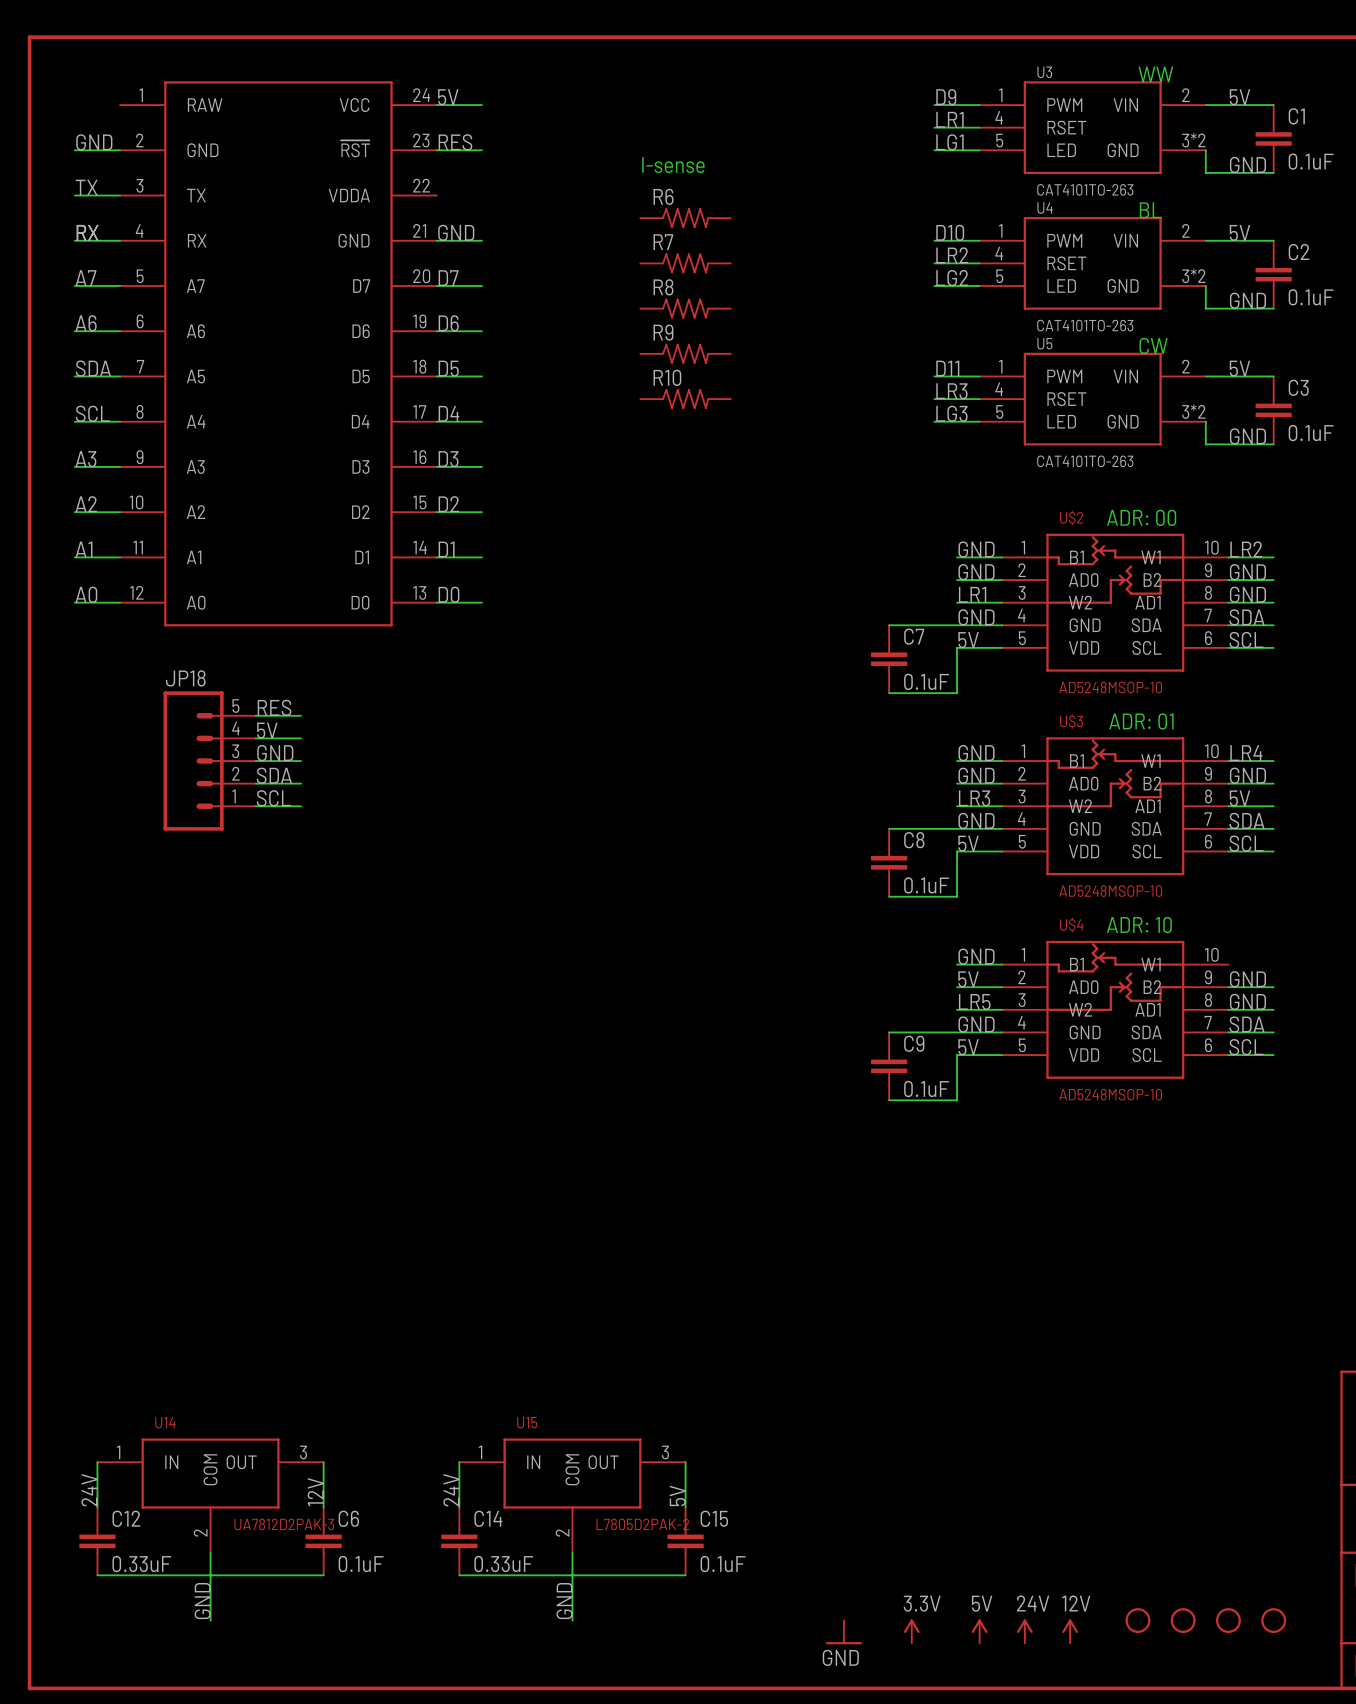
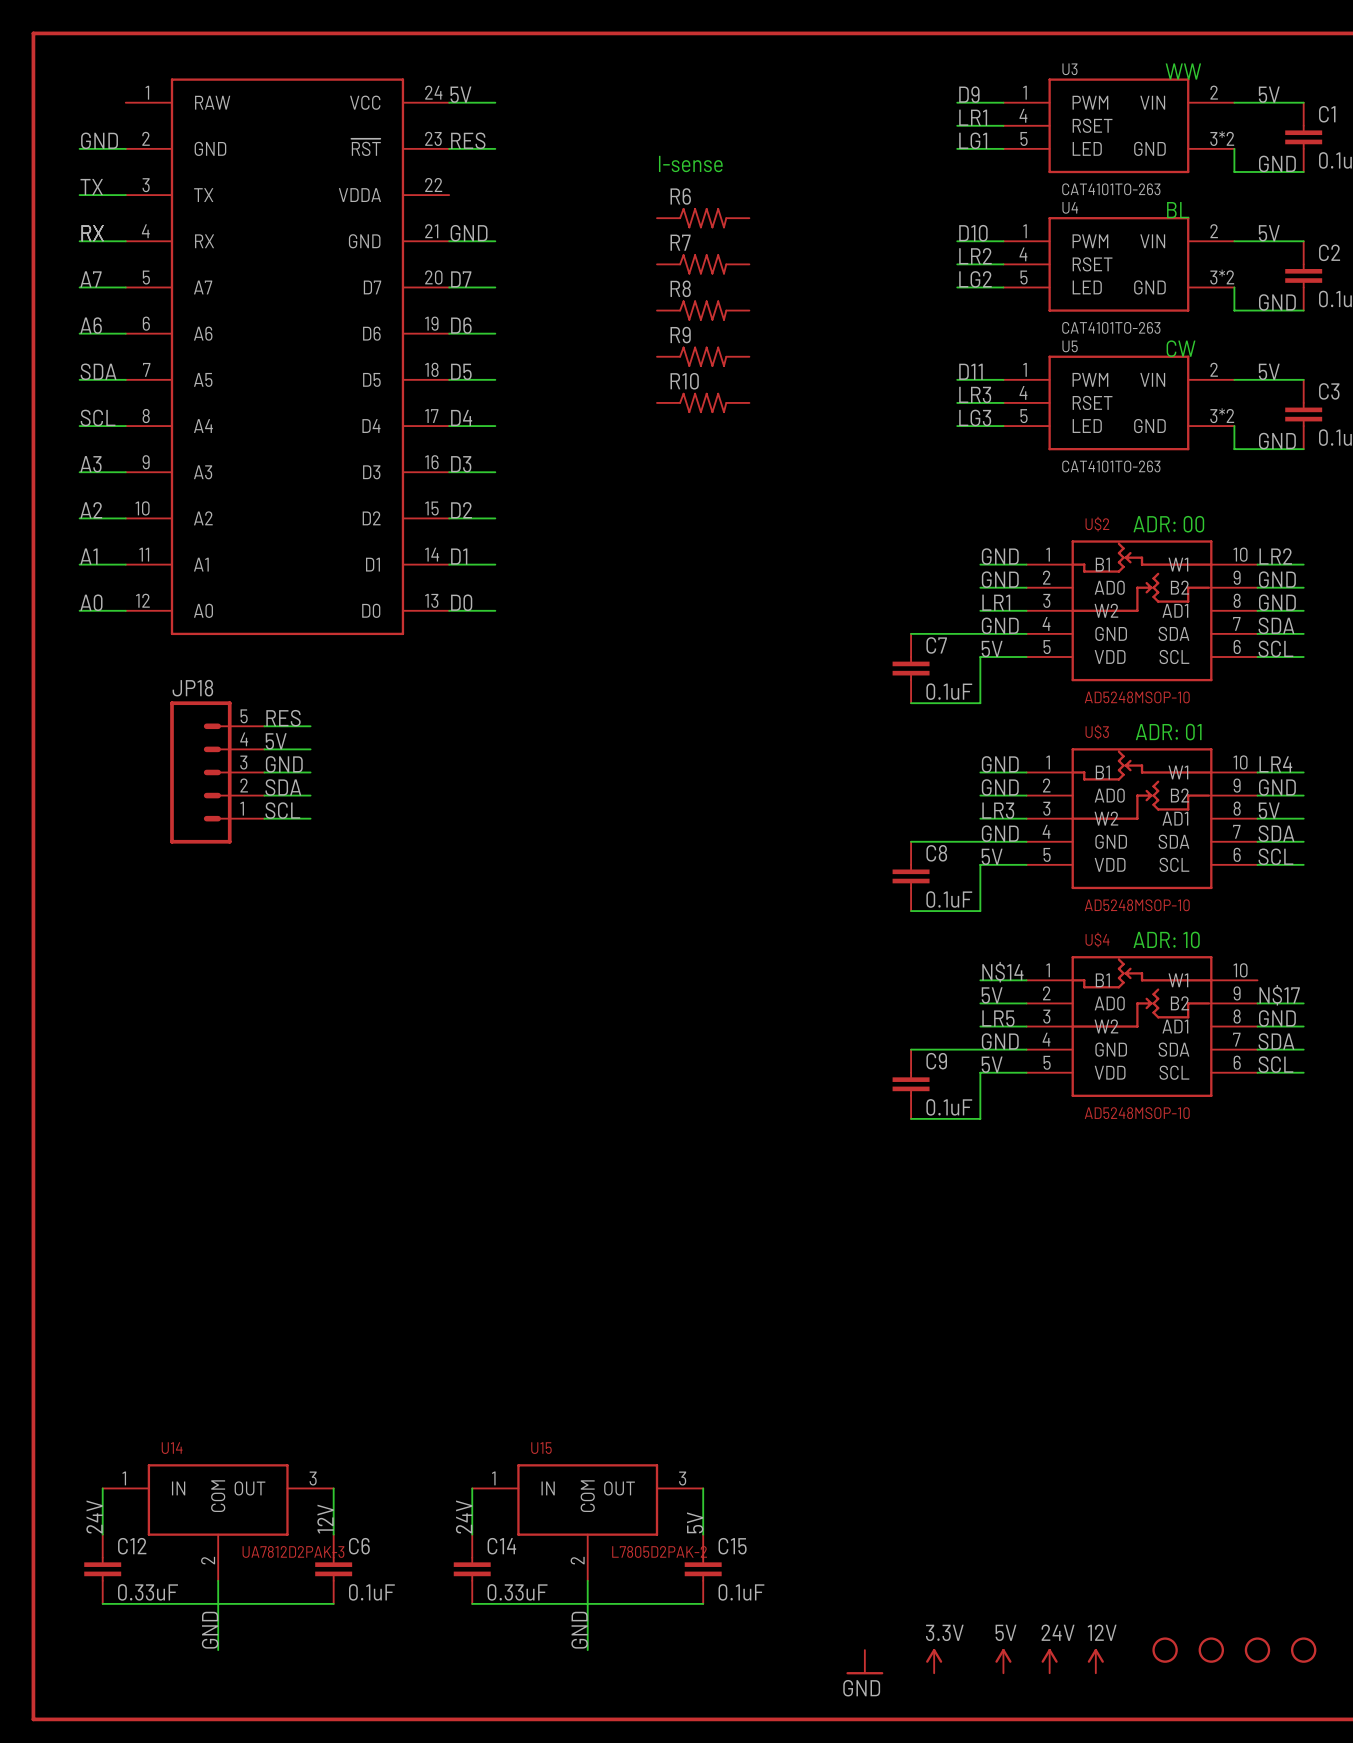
label: GND (976, 956) -> N$14 (1002, 972)
label: GND (1247, 979) -> N$17 (1279, 995)

